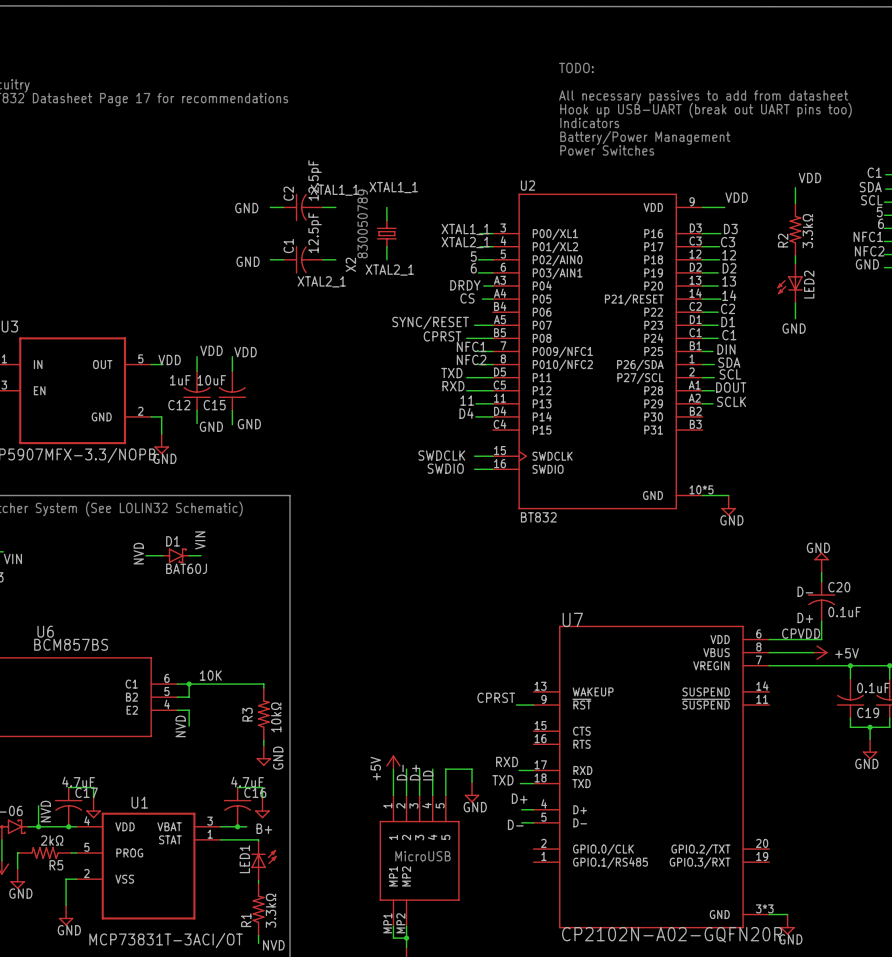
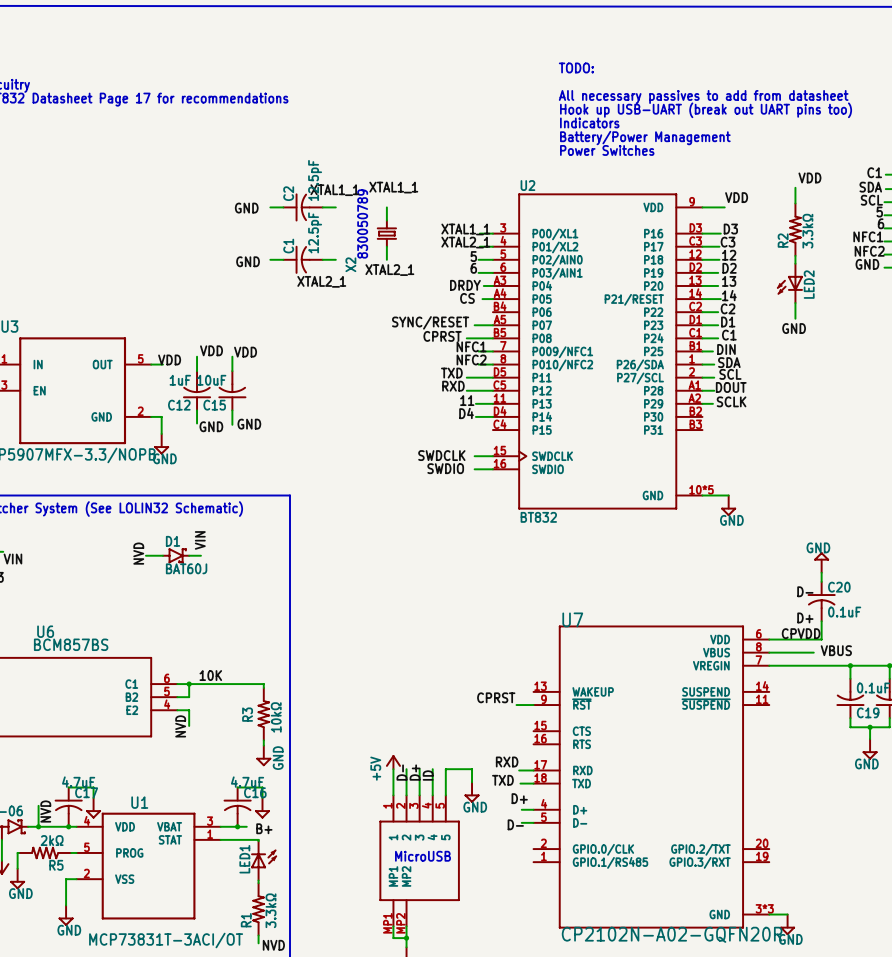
label: none -> VBUS (836, 650)
power symbol: +5V (820, 652) -> none

